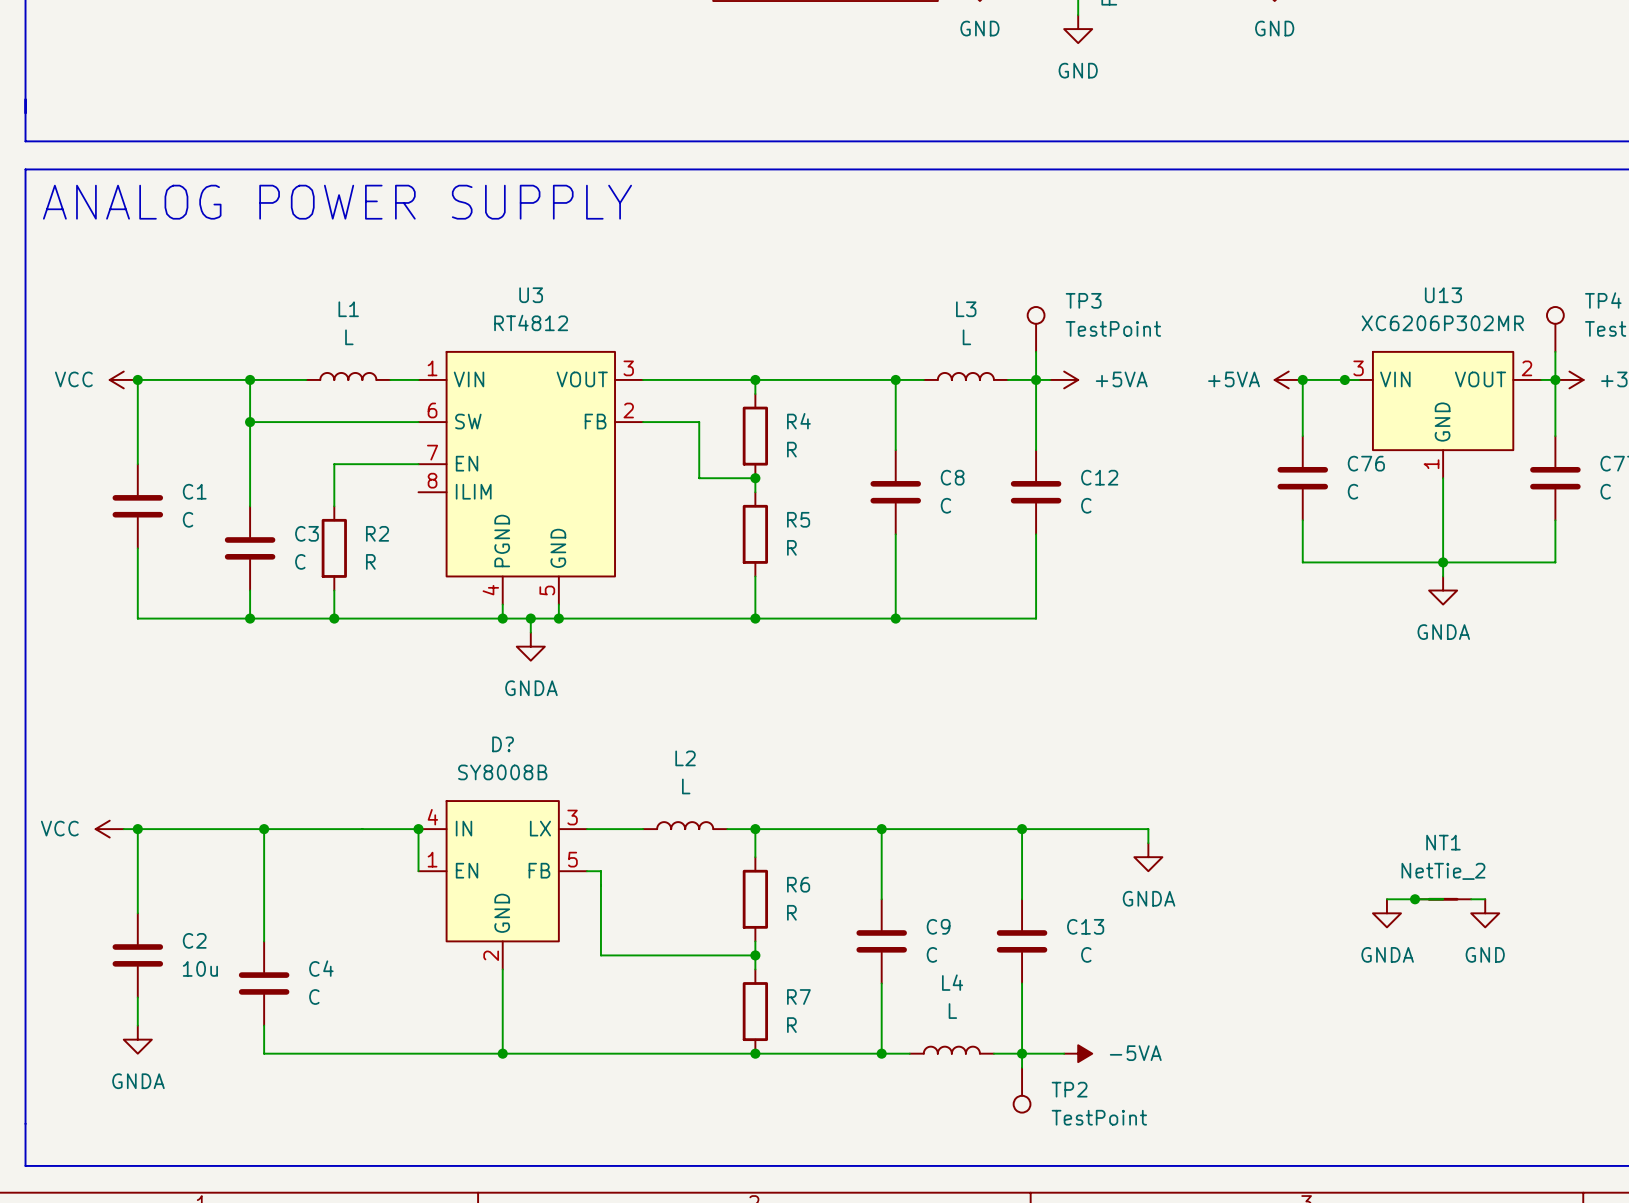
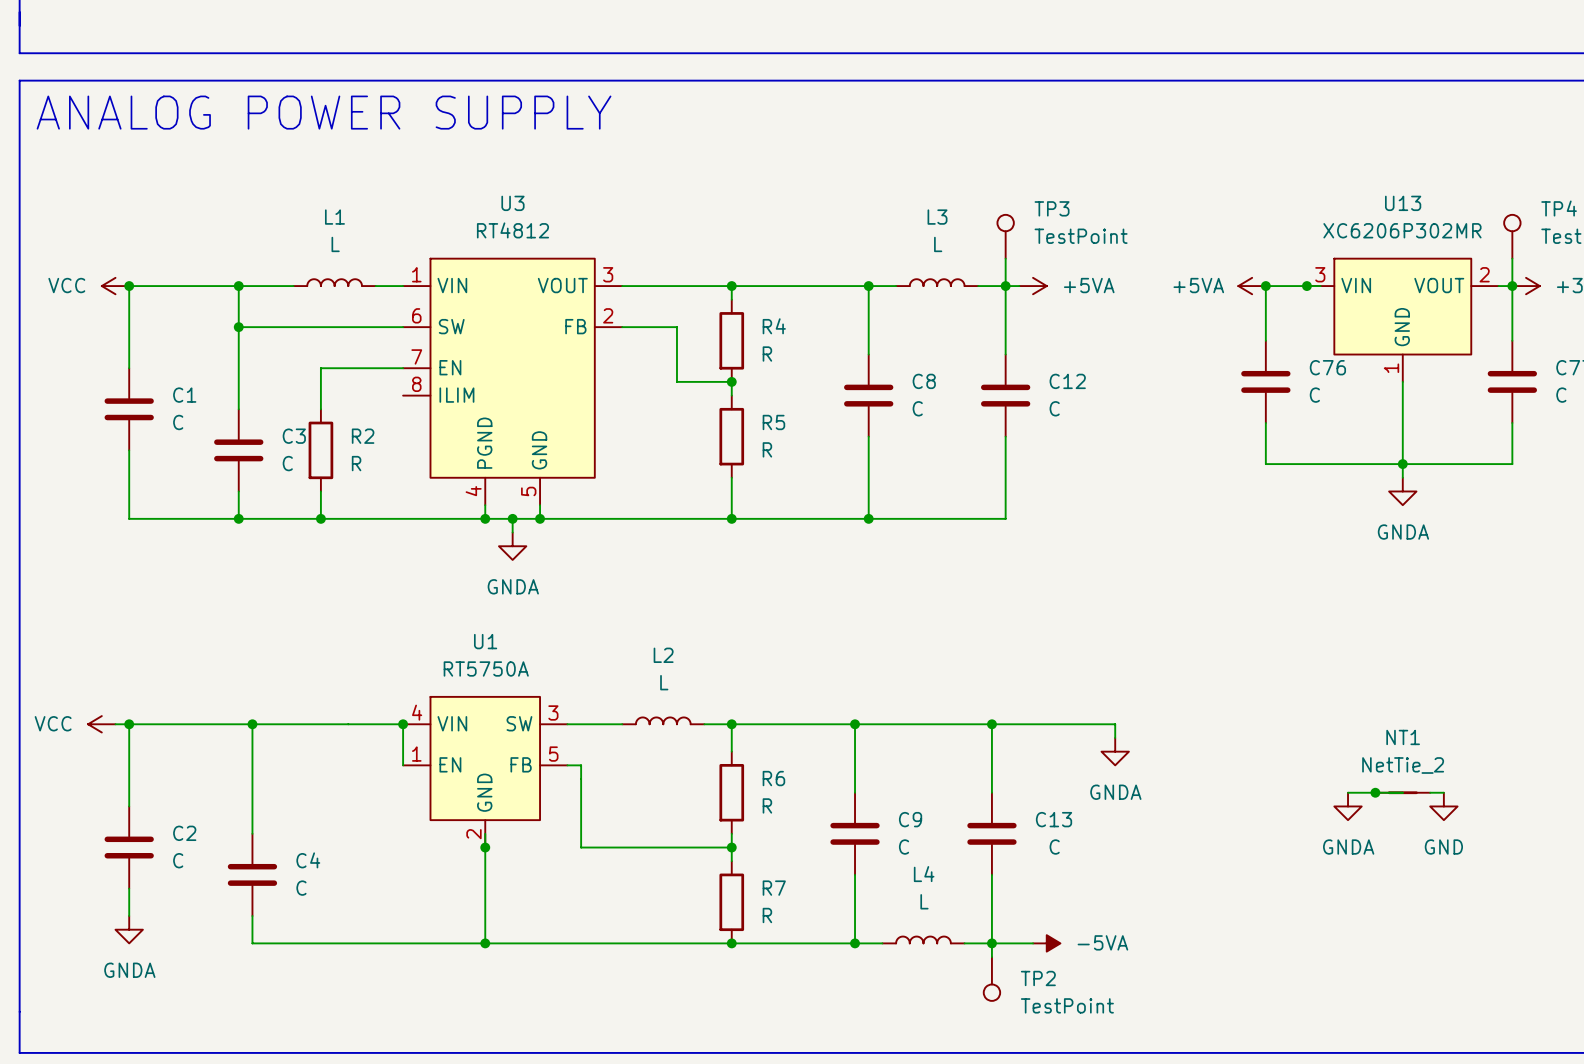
U1: none -> RT5750A (485, 772)
D?: SY8008B (502, 885) -> none
junction: none -> (485, 847)
C2 value: 10u (200, 968) -> C (178, 860)

